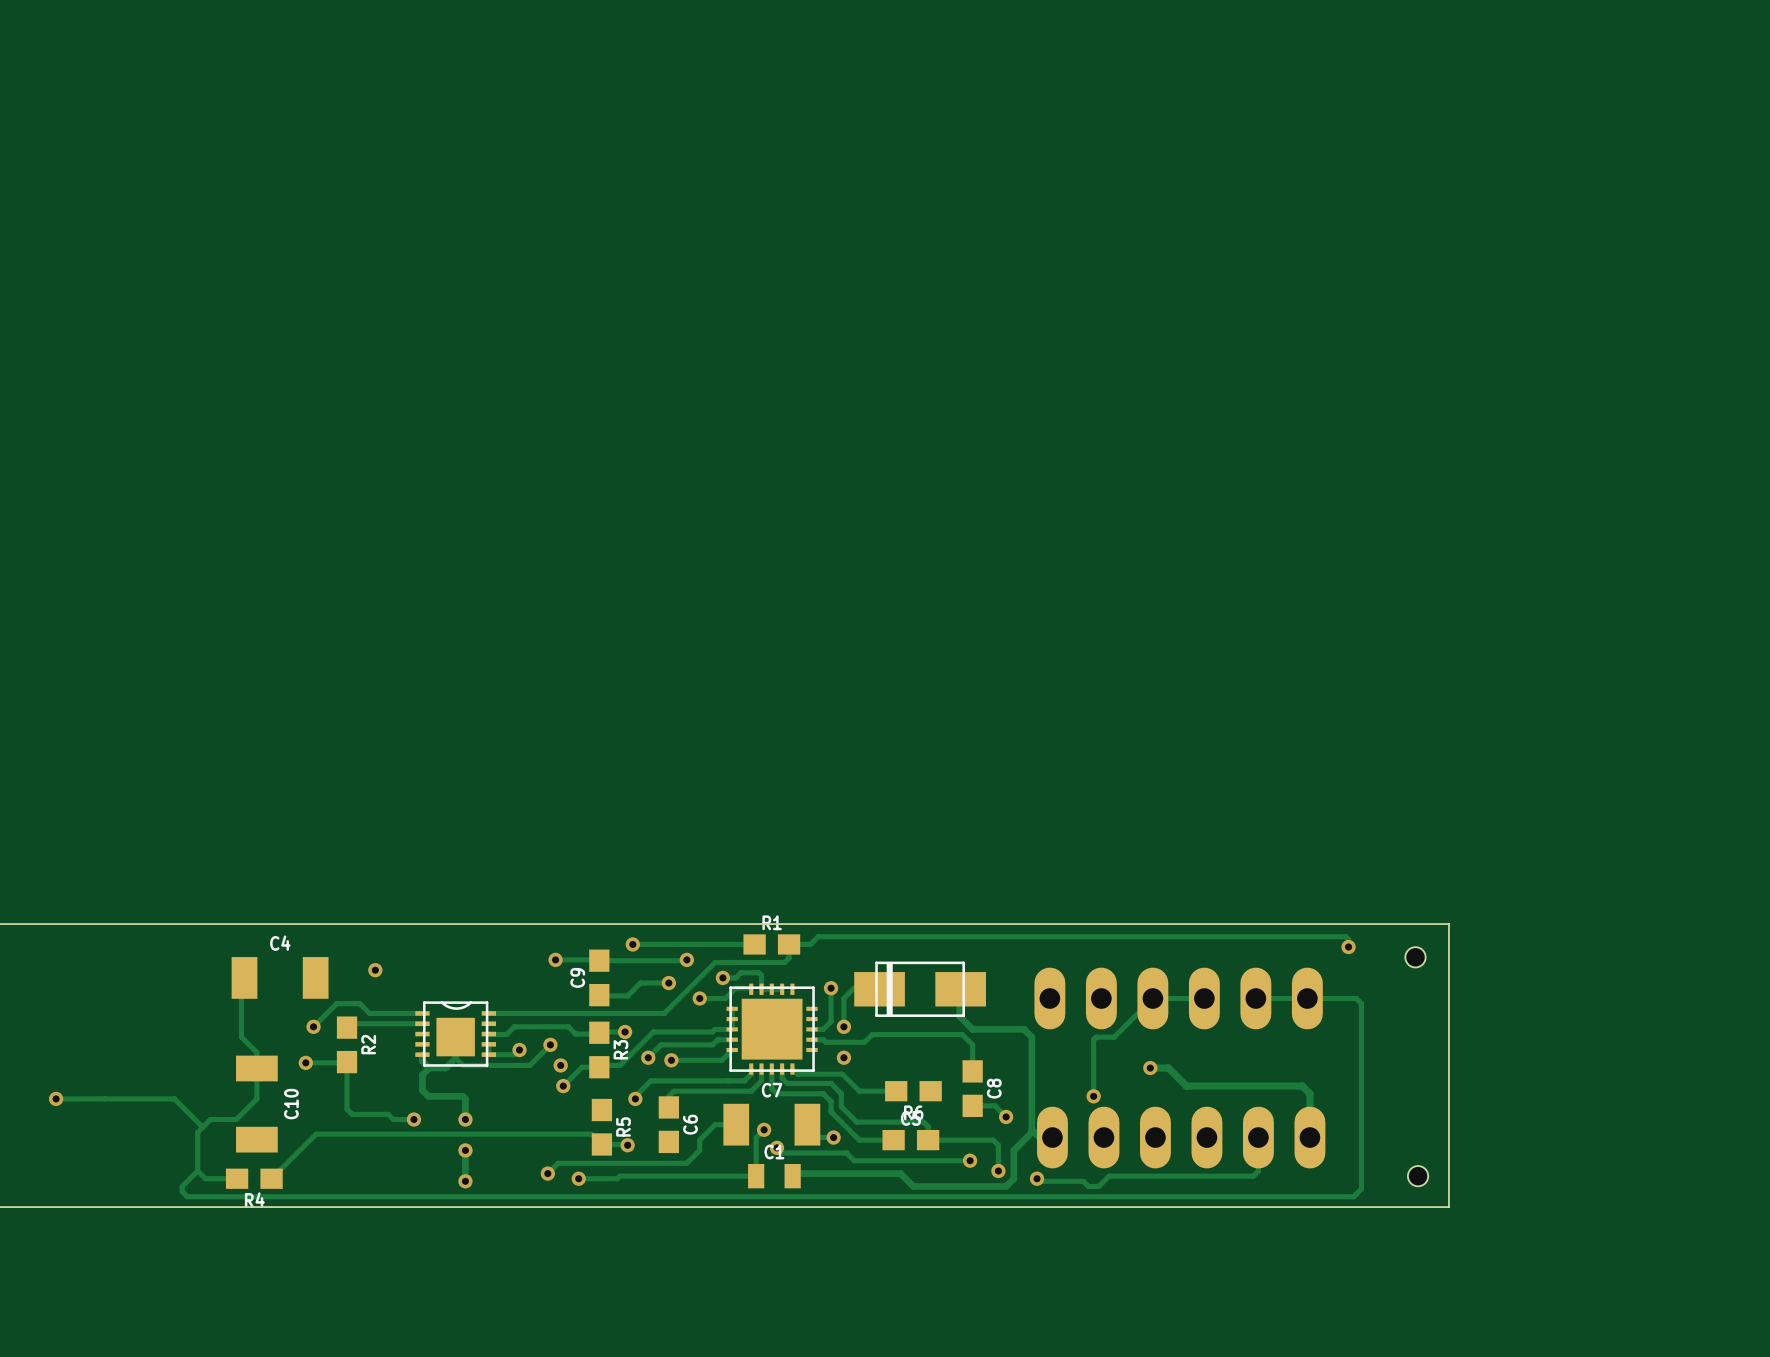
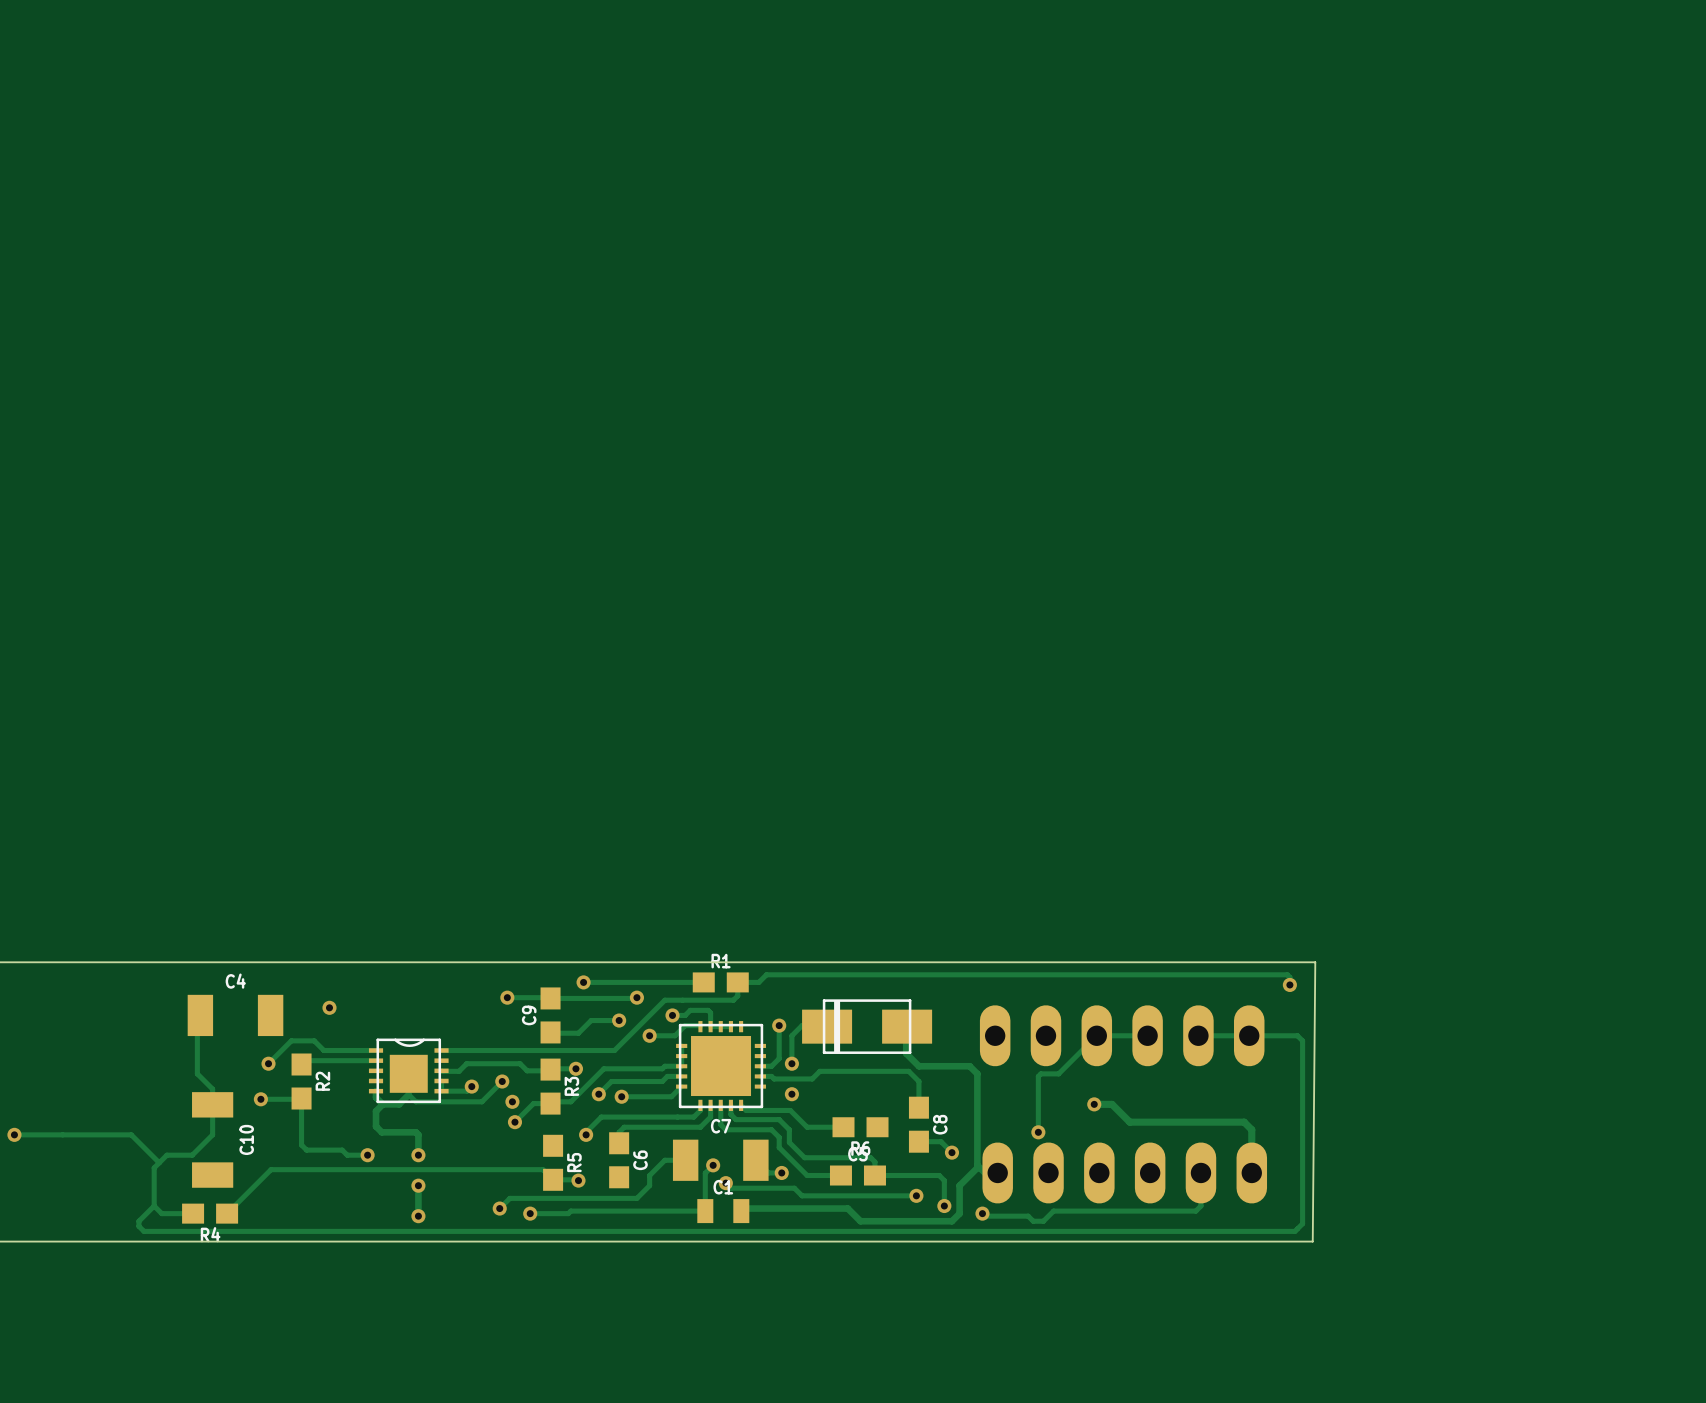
board edge: (1374, 924) (1448, 924) (1448, 1207) (1371, 1207) -> (1315, 962) (1312, 1241)
hole: (1415, 957) -> none
hole: (1418, 1176) -> none

